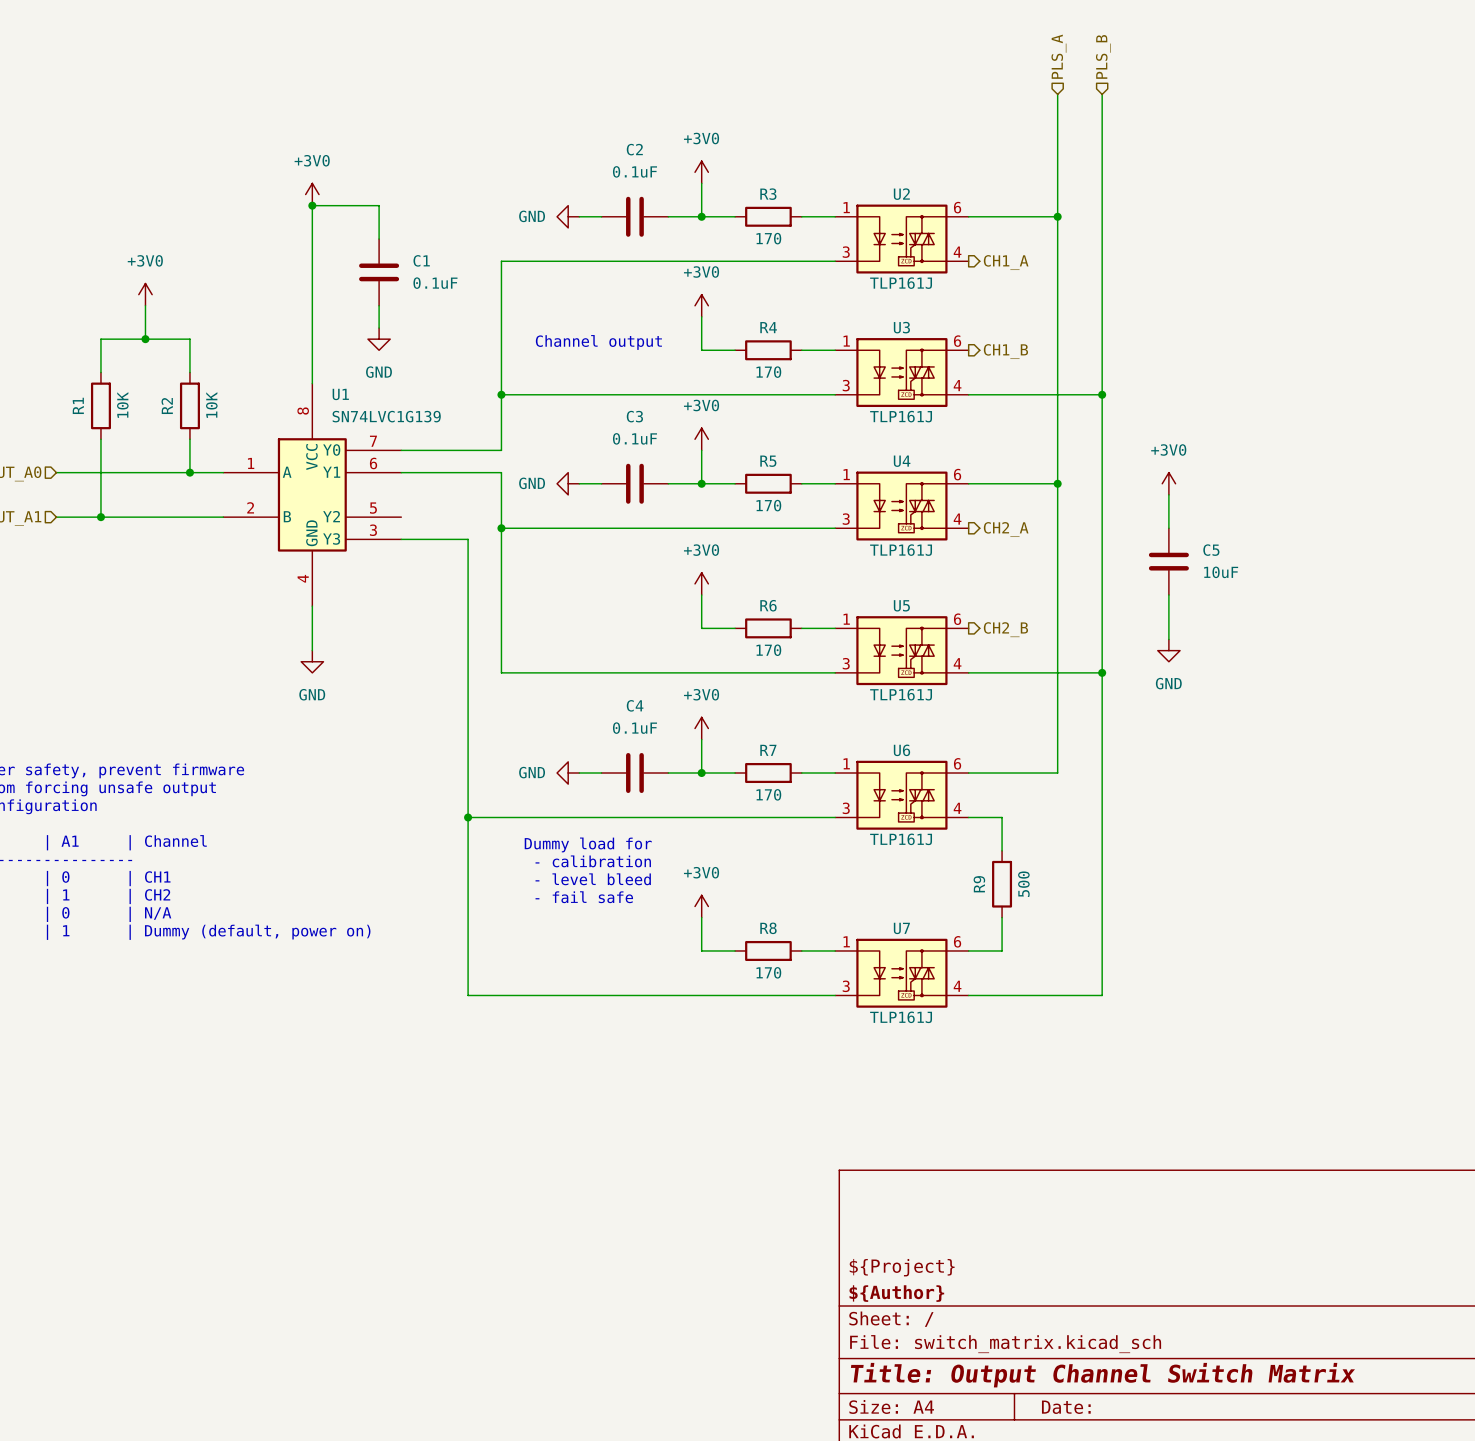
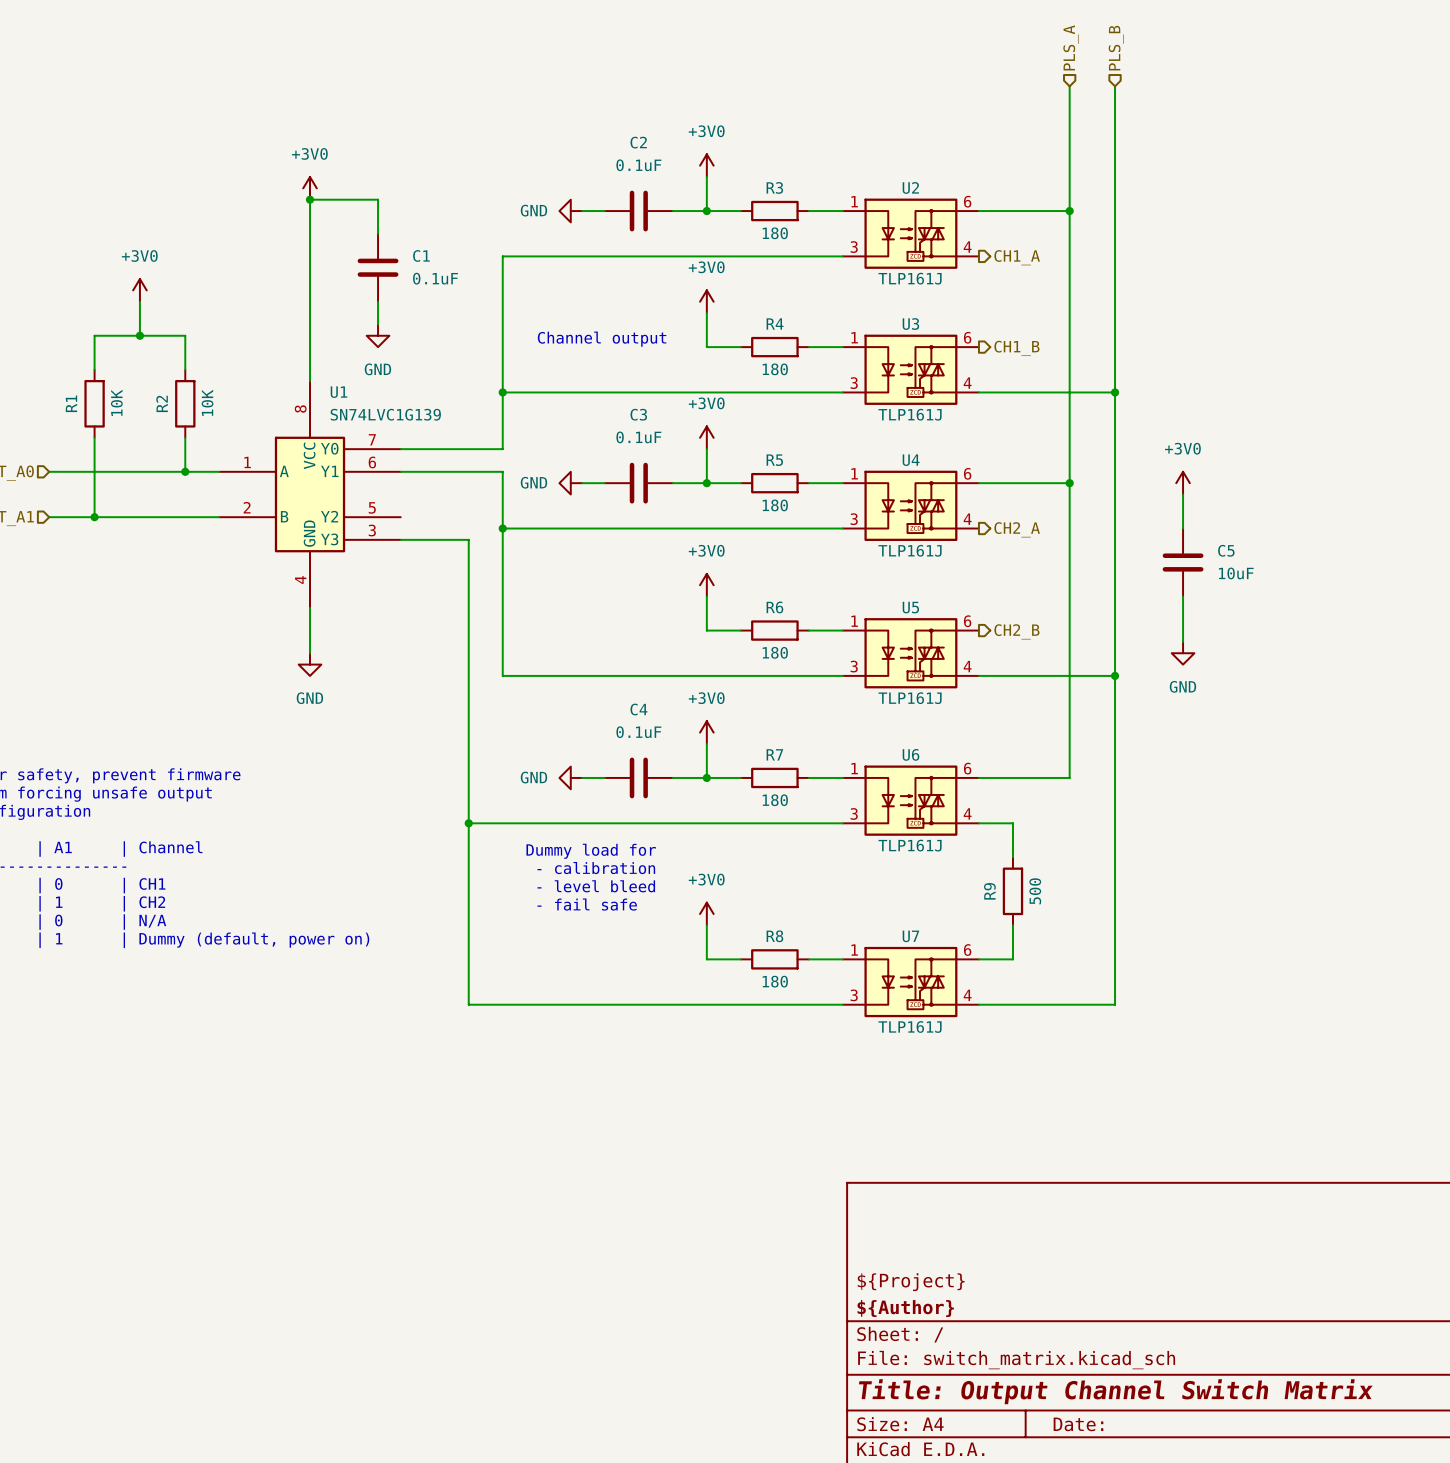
R3 value: 170 (768, 238) -> 180 (775, 233)
R4 value: 170 (768, 372) -> 180 (775, 369)
R5 value: 170 (768, 505) -> 180 (775, 505)
R6 value: 170 (768, 650) -> 180 (775, 652)
R7 value: 170 (768, 794) -> 180 (775, 800)
R8 value: 170 (768, 972) -> 180 (775, 981)

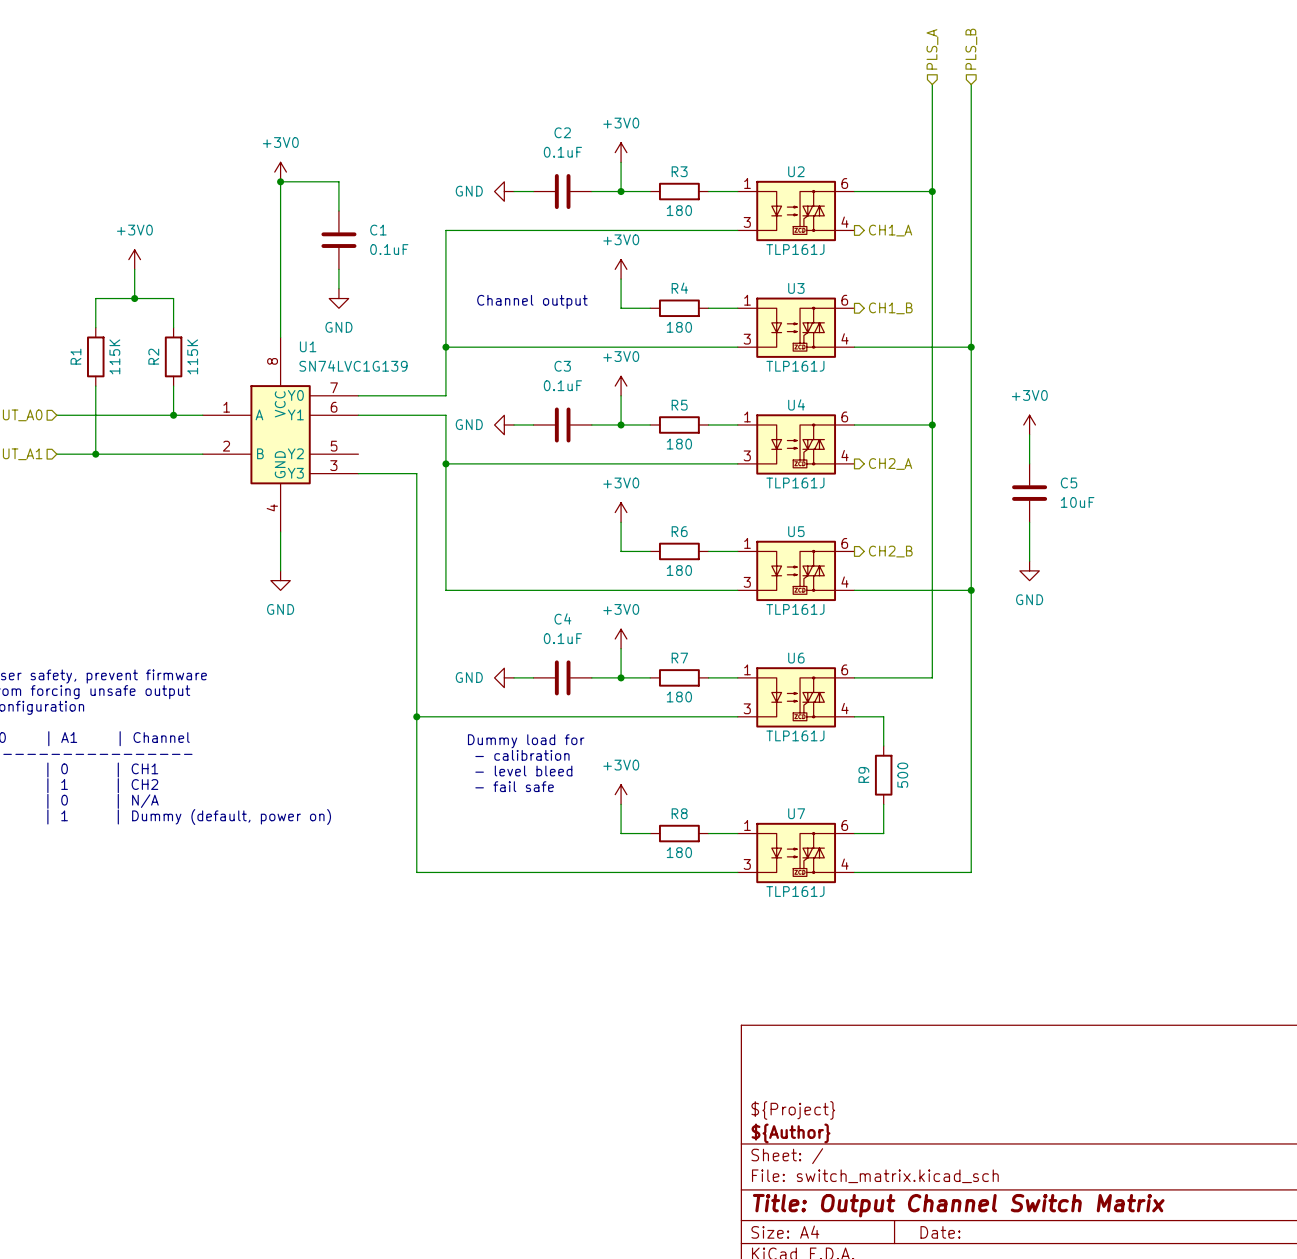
R1 value: 10K (116, 402) -> 115K (114, 356)
R2 value: 10K (207, 402) -> 115K (192, 356)

